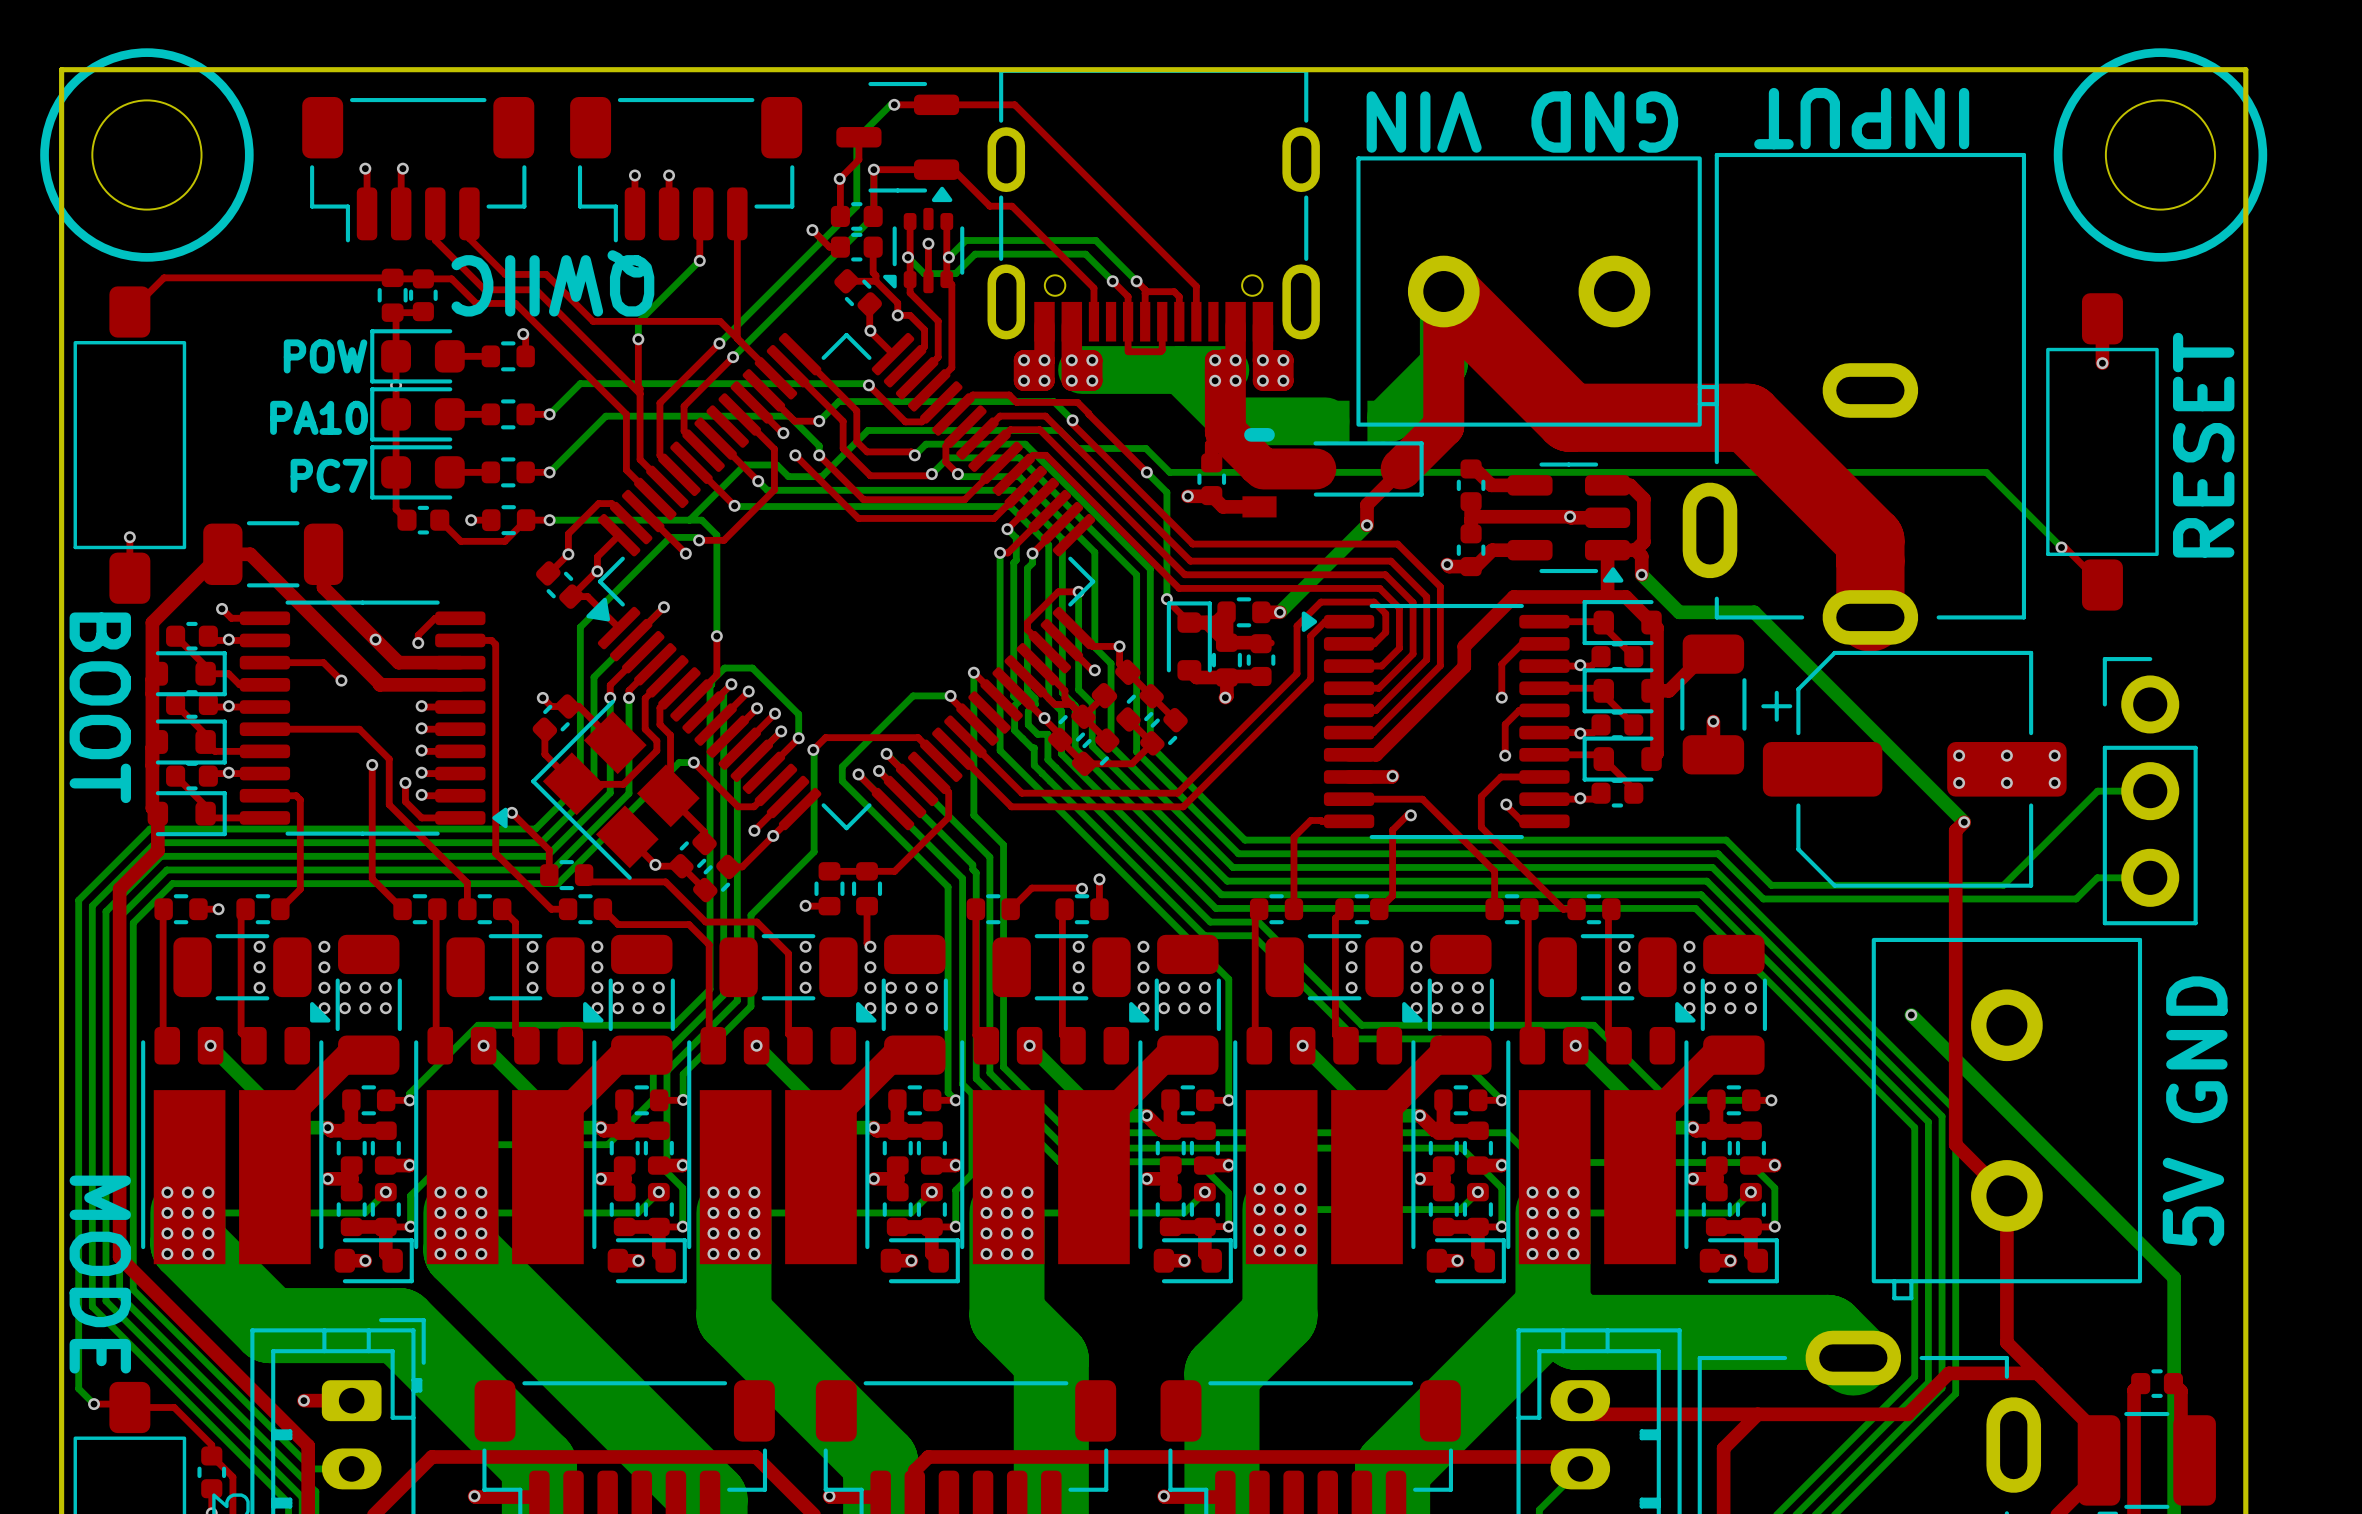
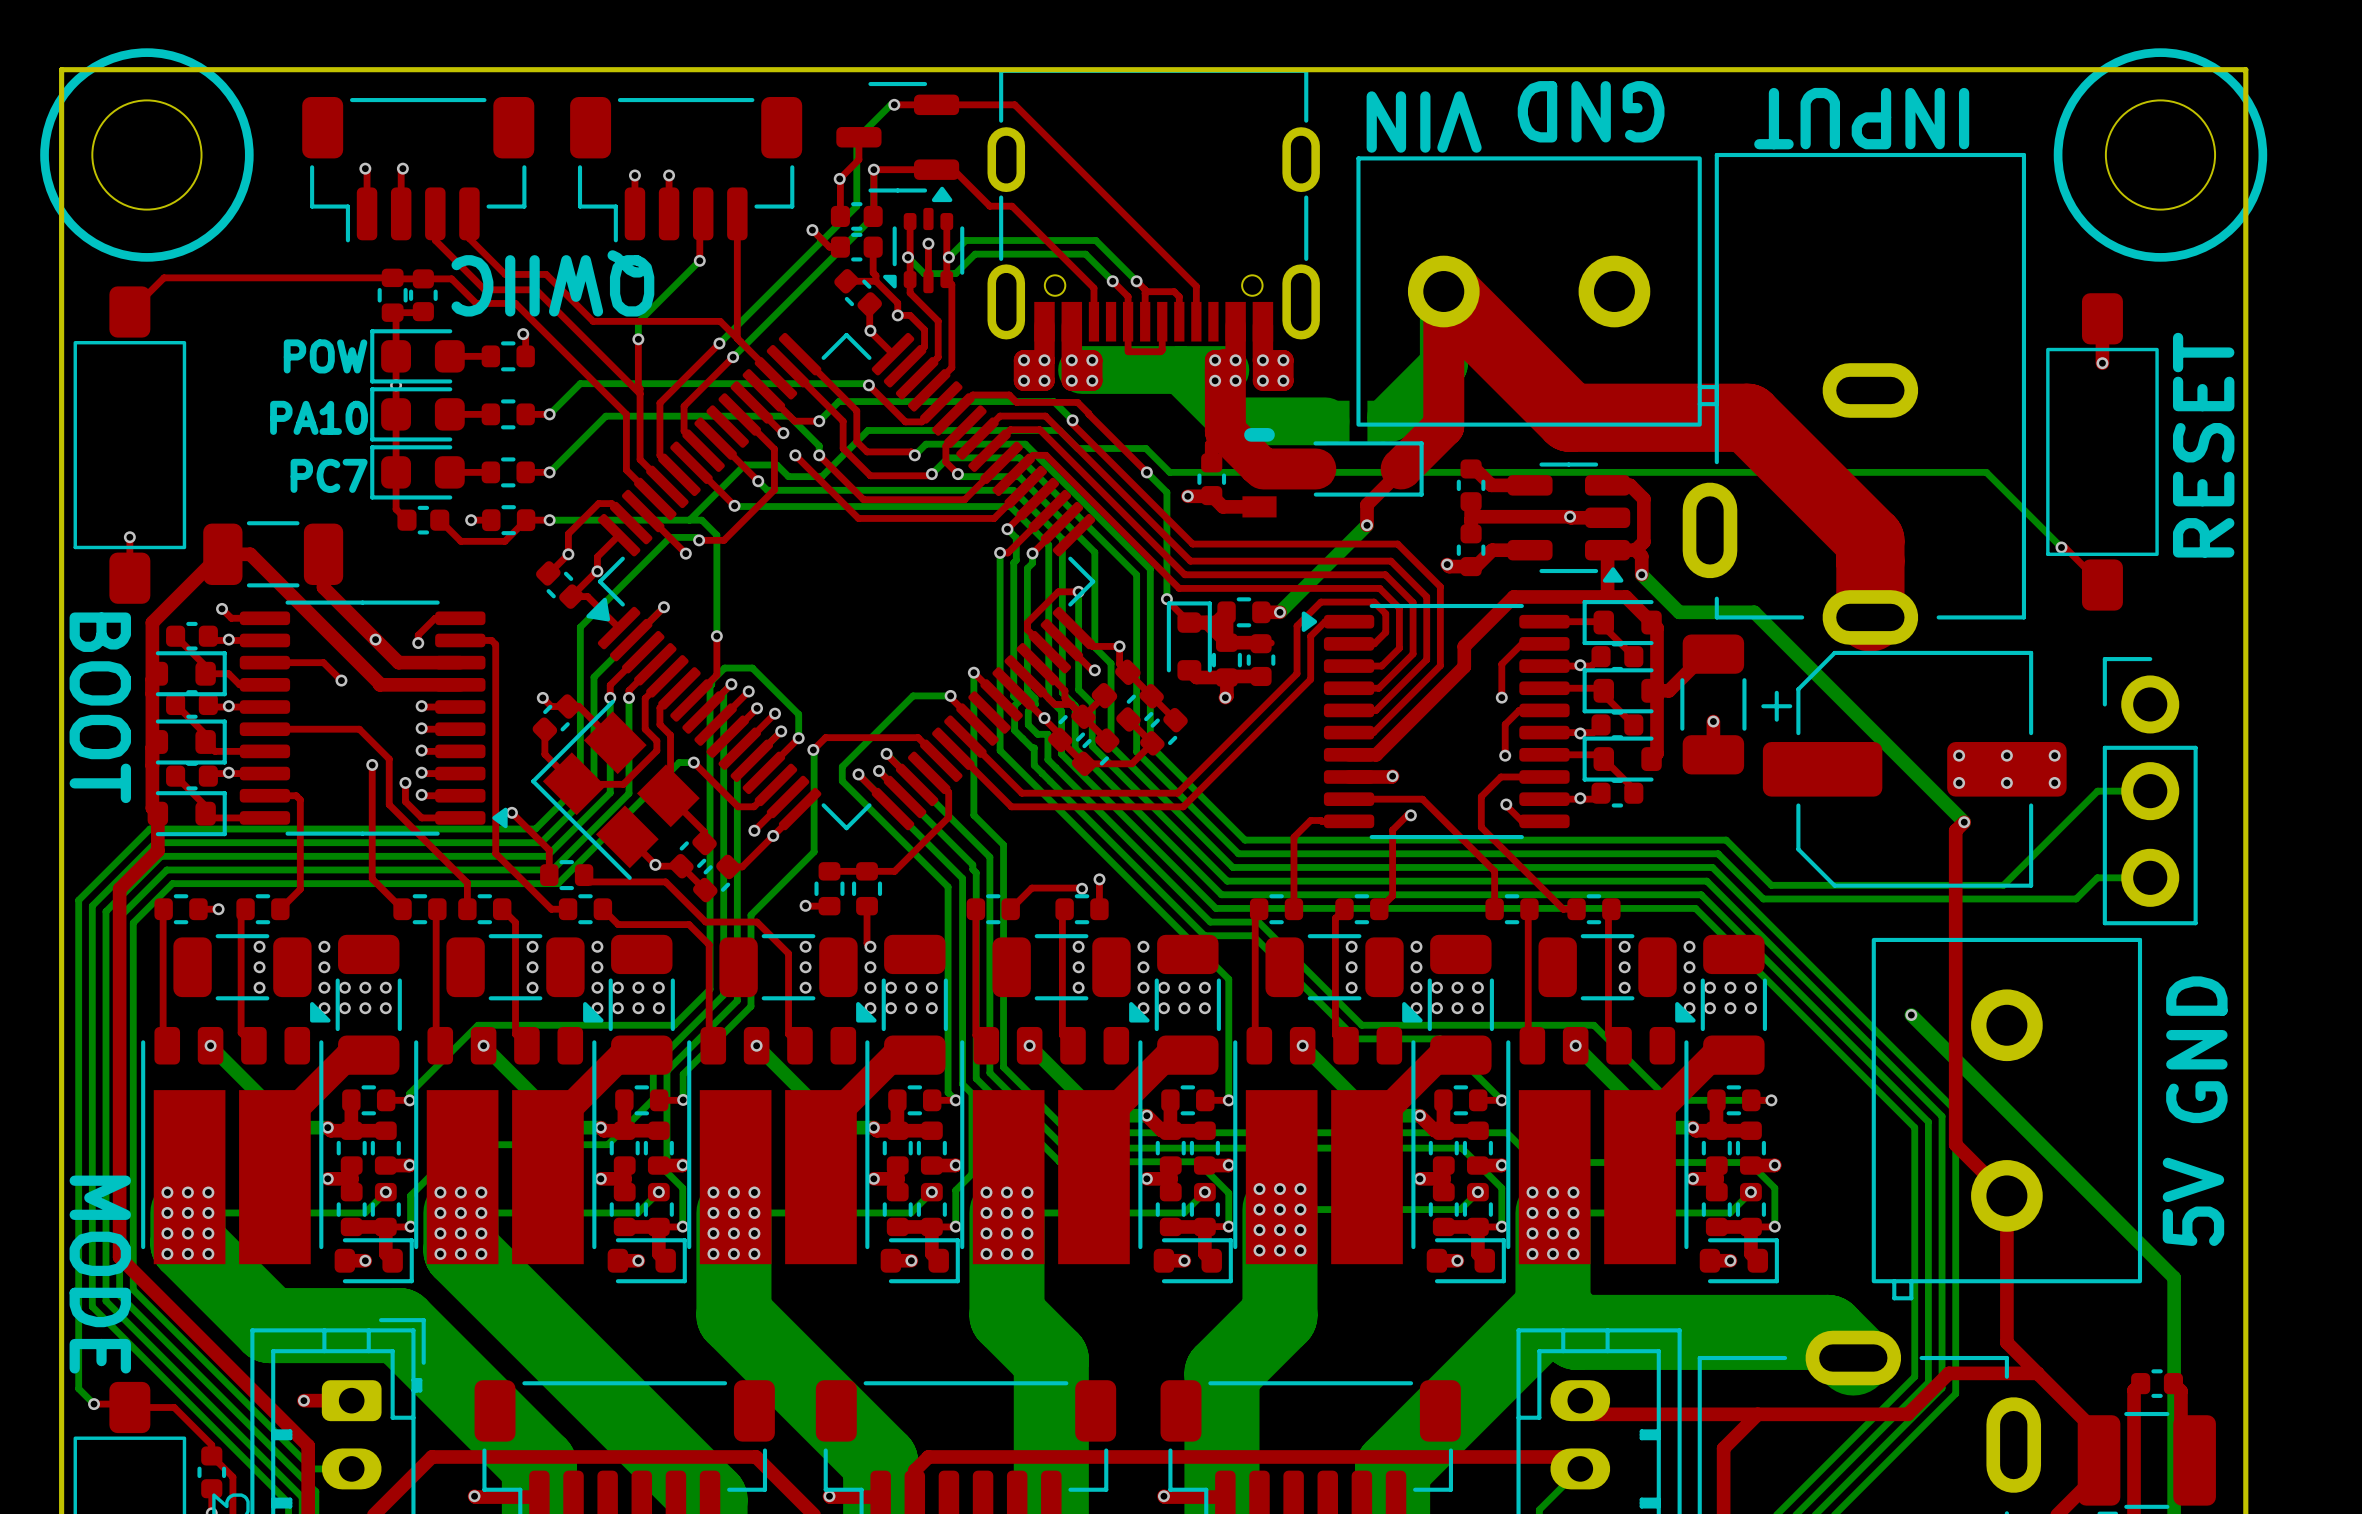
text position: GND (1604, 122) -> GND (1591, 111)

